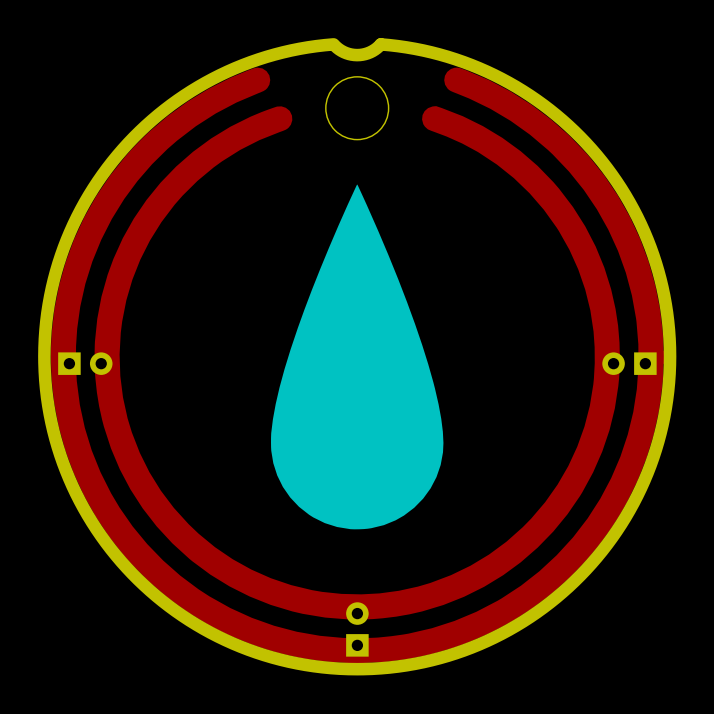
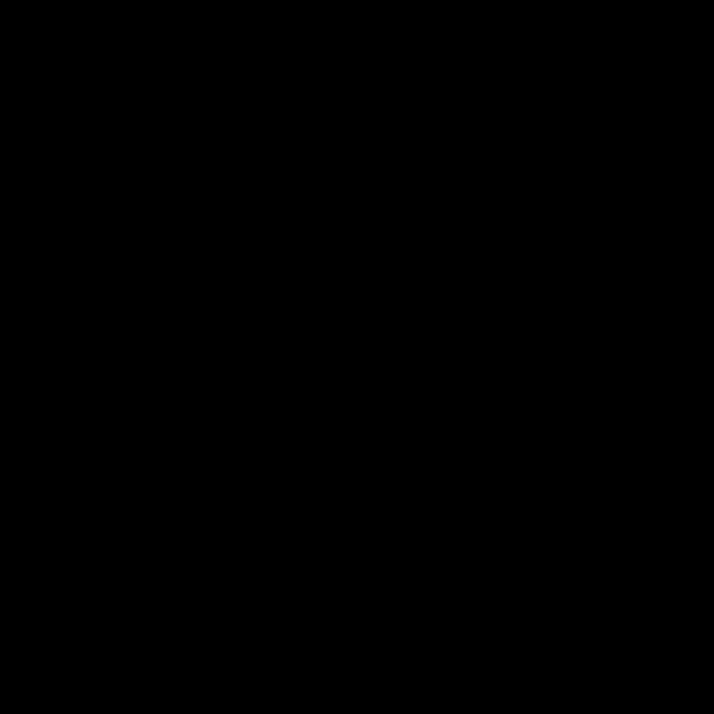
part: (357, 356) -> none
part: (85, 363) -> none
part: (629, 363) -> none
part: (357, 629) -> none

